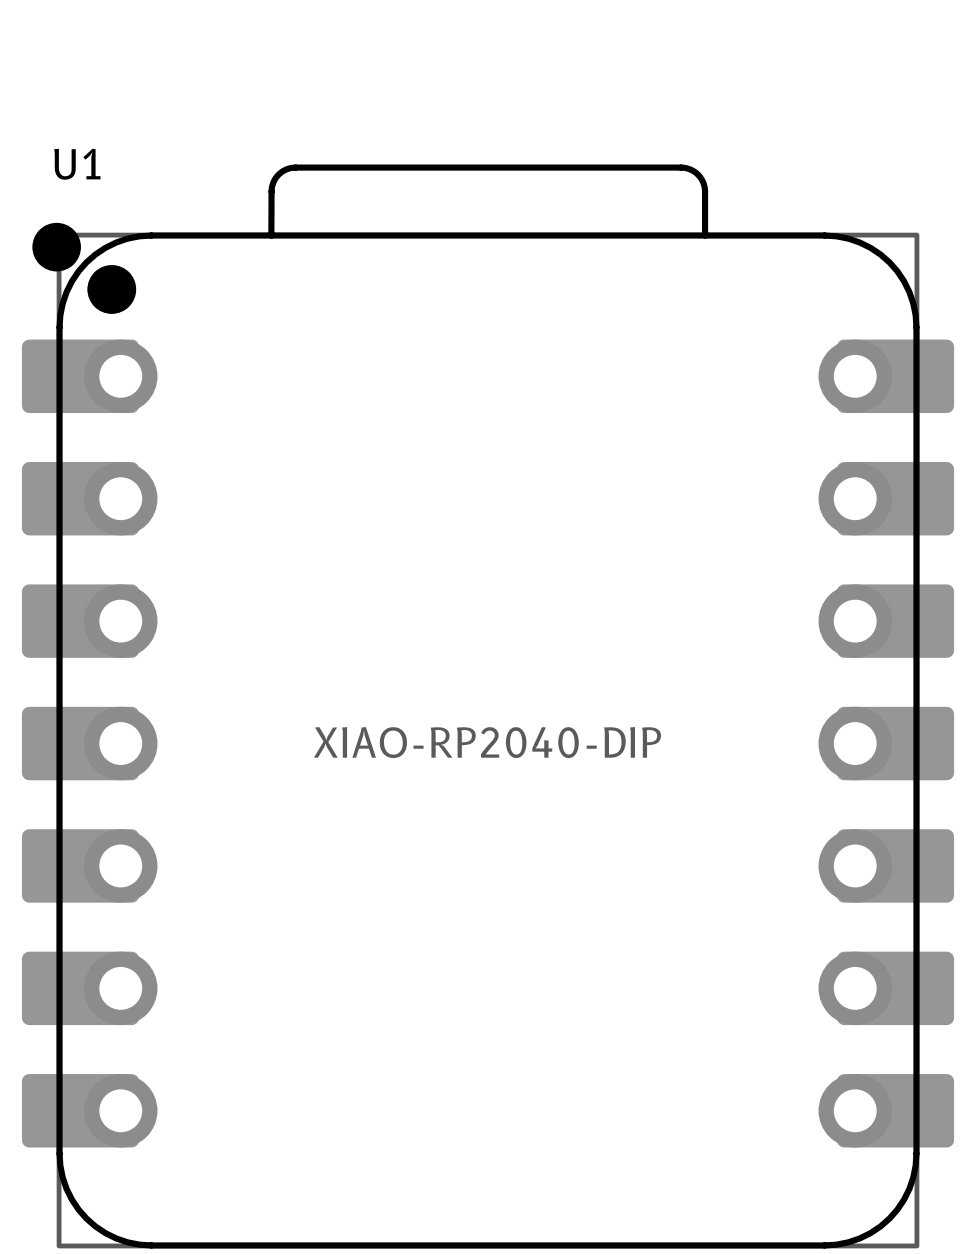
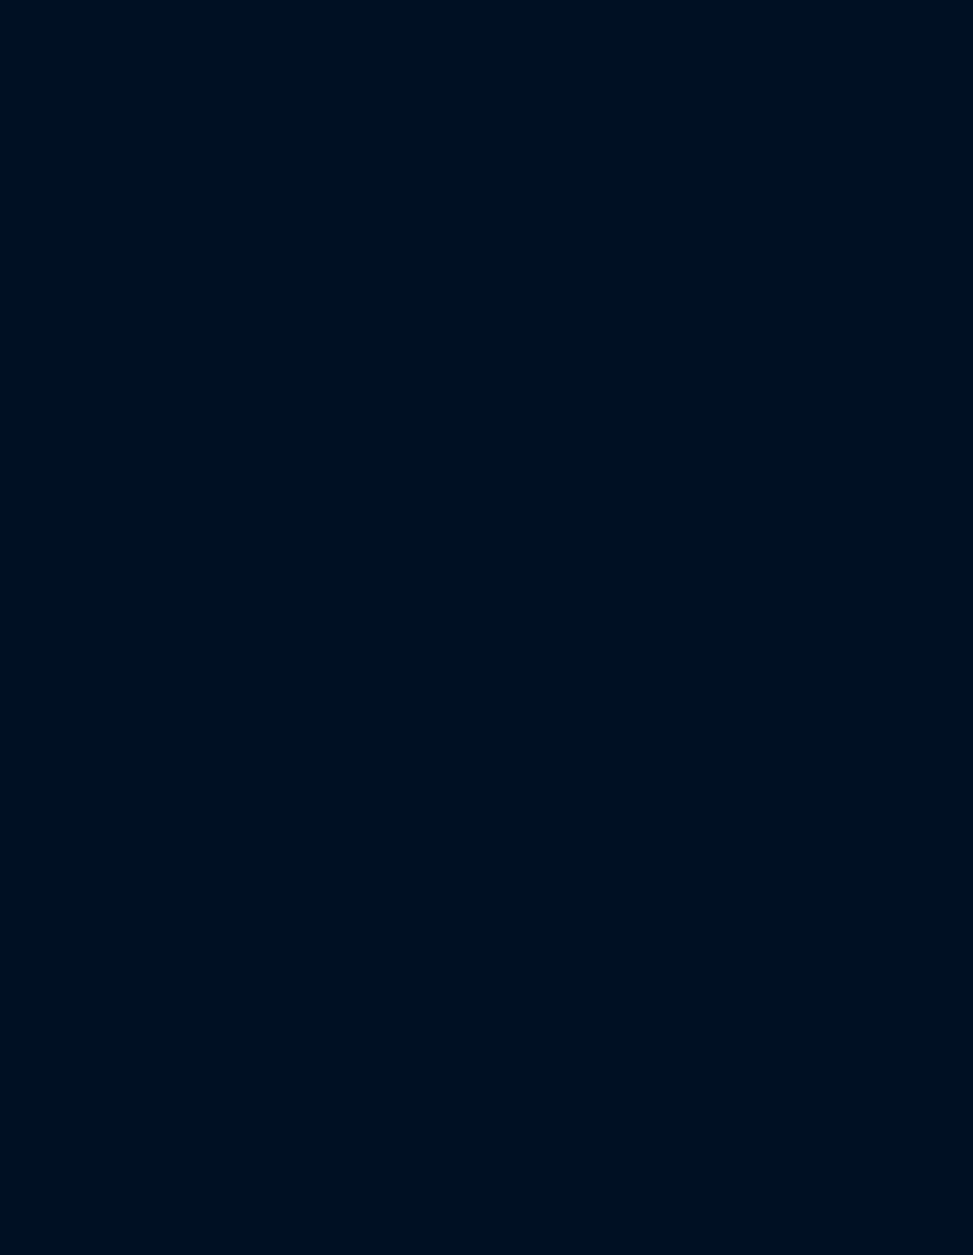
U1: XIAO-RP2040-DIP (488, 706) -> none

